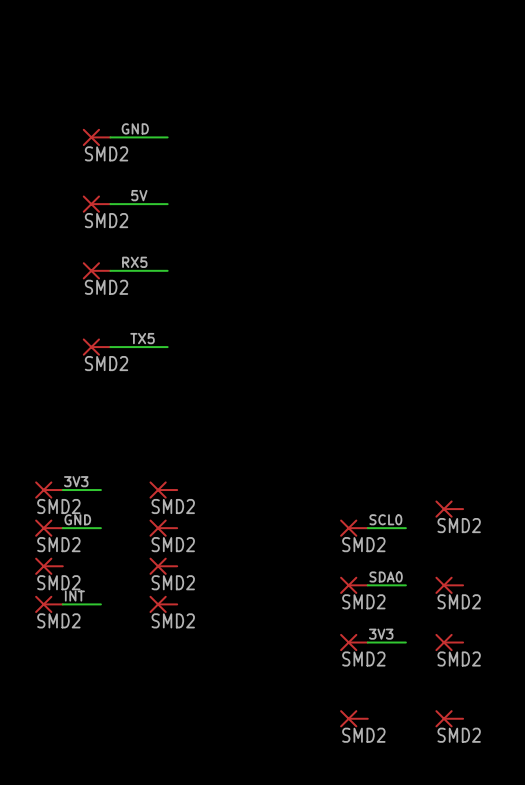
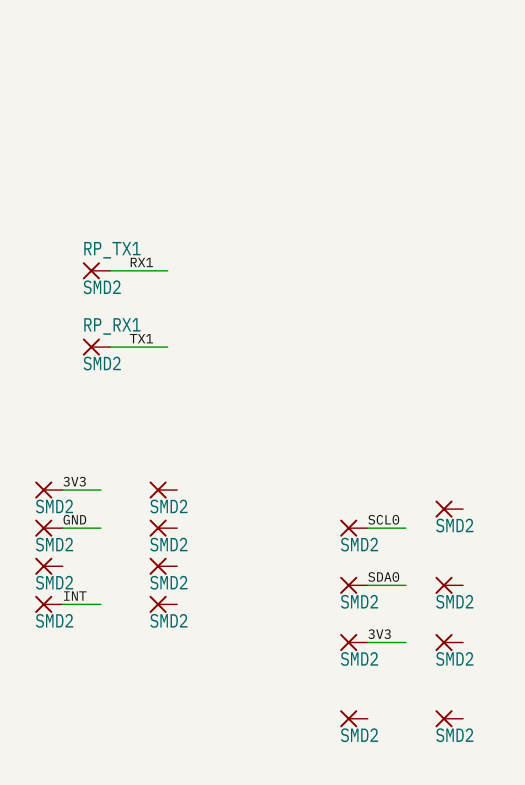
label: GND (135, 128) -> none
part: SMD2 (96, 137) -> none
wire: (110, 137) (167, 137) -> none
label: 5V (139, 195) -> none
part: SMD2 (96, 204) -> none
wire: (110, 204) (167, 204) -> none
RP_TX1 name: none -> RP_TX1 (112, 250)
label: RX5 (134, 262) -> RX1 (141, 262)
RP_RX1 name: none -> RP_RX1 (112, 326)
label: TX5 (142, 338) -> TX1 (141, 338)

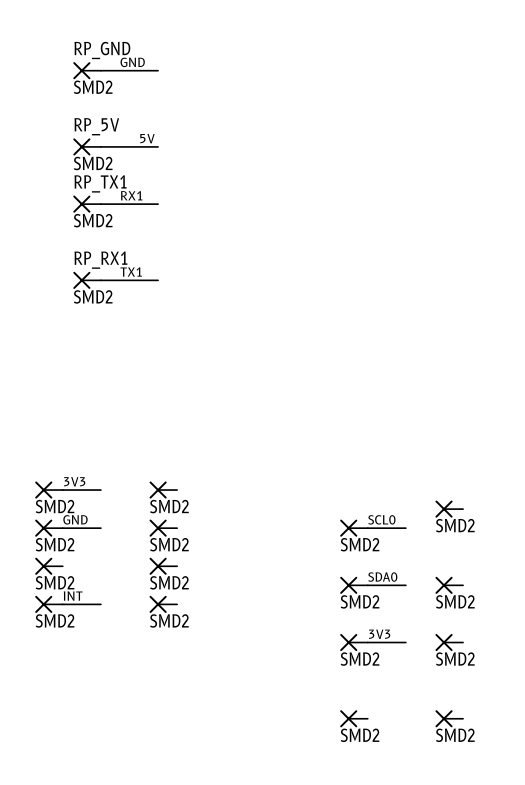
label: none -> GND (132, 62)
RP_GND: none -> SMD2 (87, 70)
wire: none -> (100, 70) (158, 70)
label: none -> 5V (147, 138)
RP_5V: none -> SMD2 (87, 146)
wire: none -> (100, 146) (158, 146)
label position: RX1 (141, 262) -> RX1 (131, 195)
RP_TX1 position: (96, 270) -> (87, 204)
wire: (110, 270) (167, 270) -> (100, 204) (158, 204)
label position: TX1 (141, 338) -> TX1 (131, 272)
RP_RX1 position: (96, 347) -> (87, 280)
wire: (110, 347) (167, 347) -> (100, 280) (158, 280)

